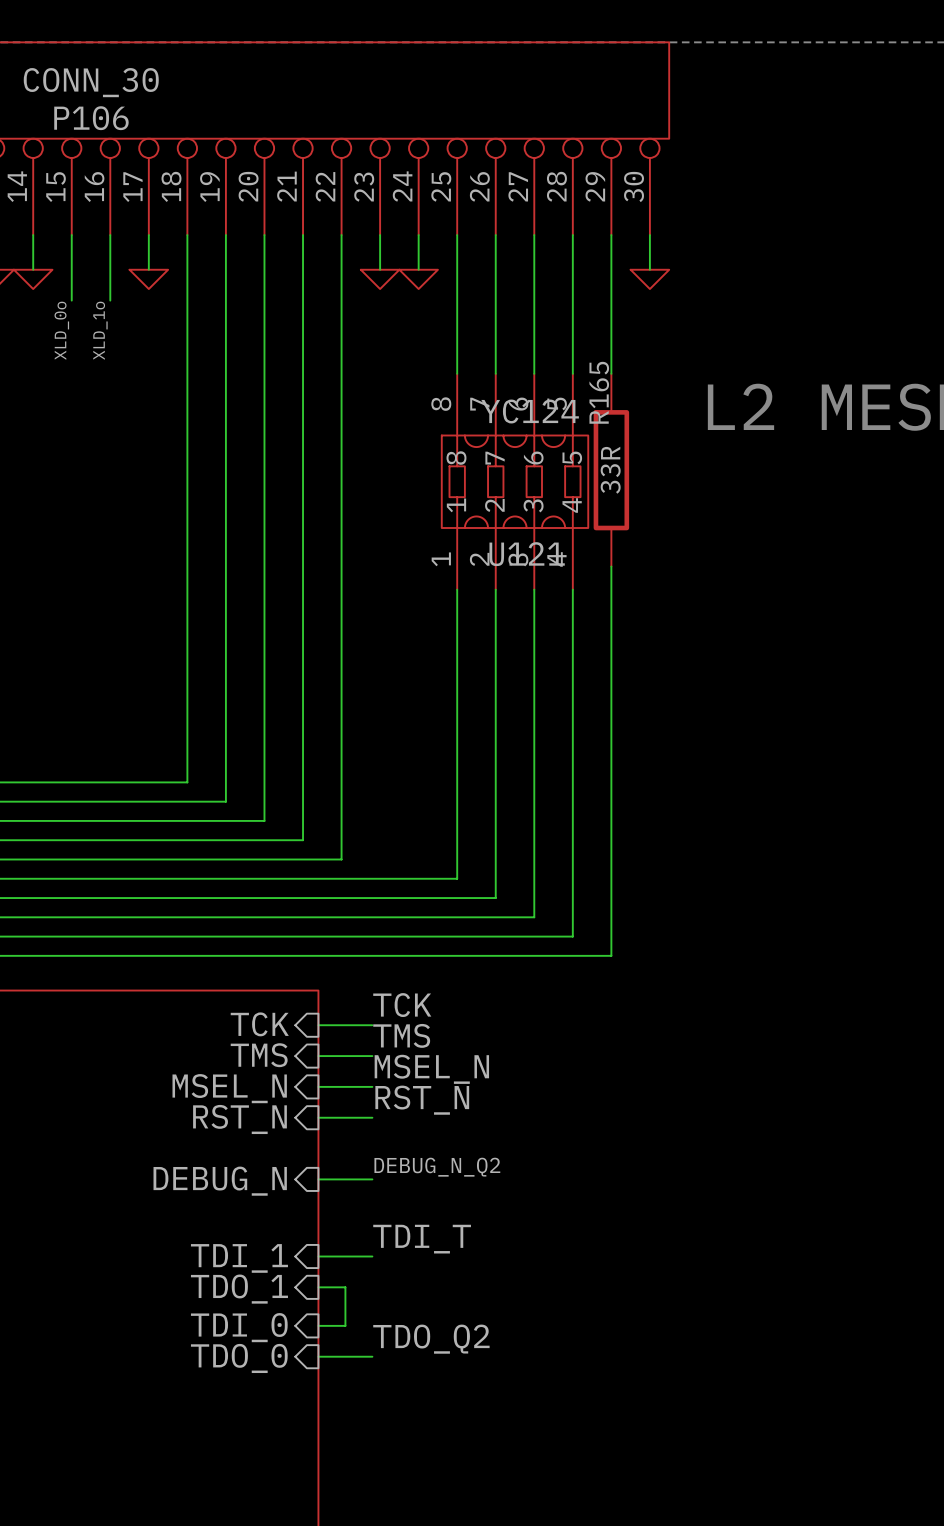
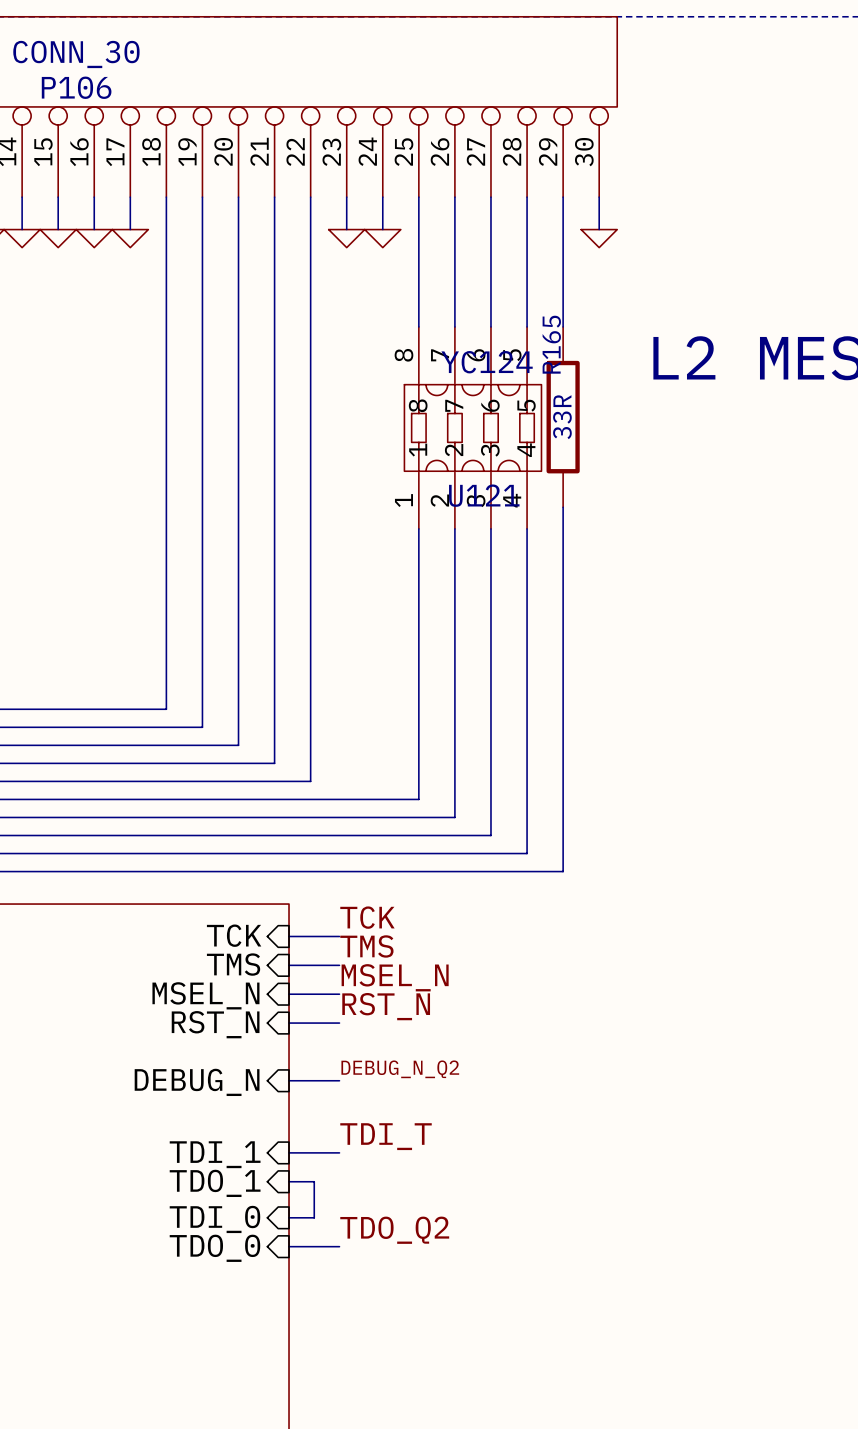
wire: (71, 269) (71, 300) -> none
wire: (110, 269) (110, 300) -> none
power symbol: none -> (58, 238)
power symbol: none -> (94, 238)
label: XLD_0o (61, 330) -> none
label: XLD_1o (100, 330) -> none

